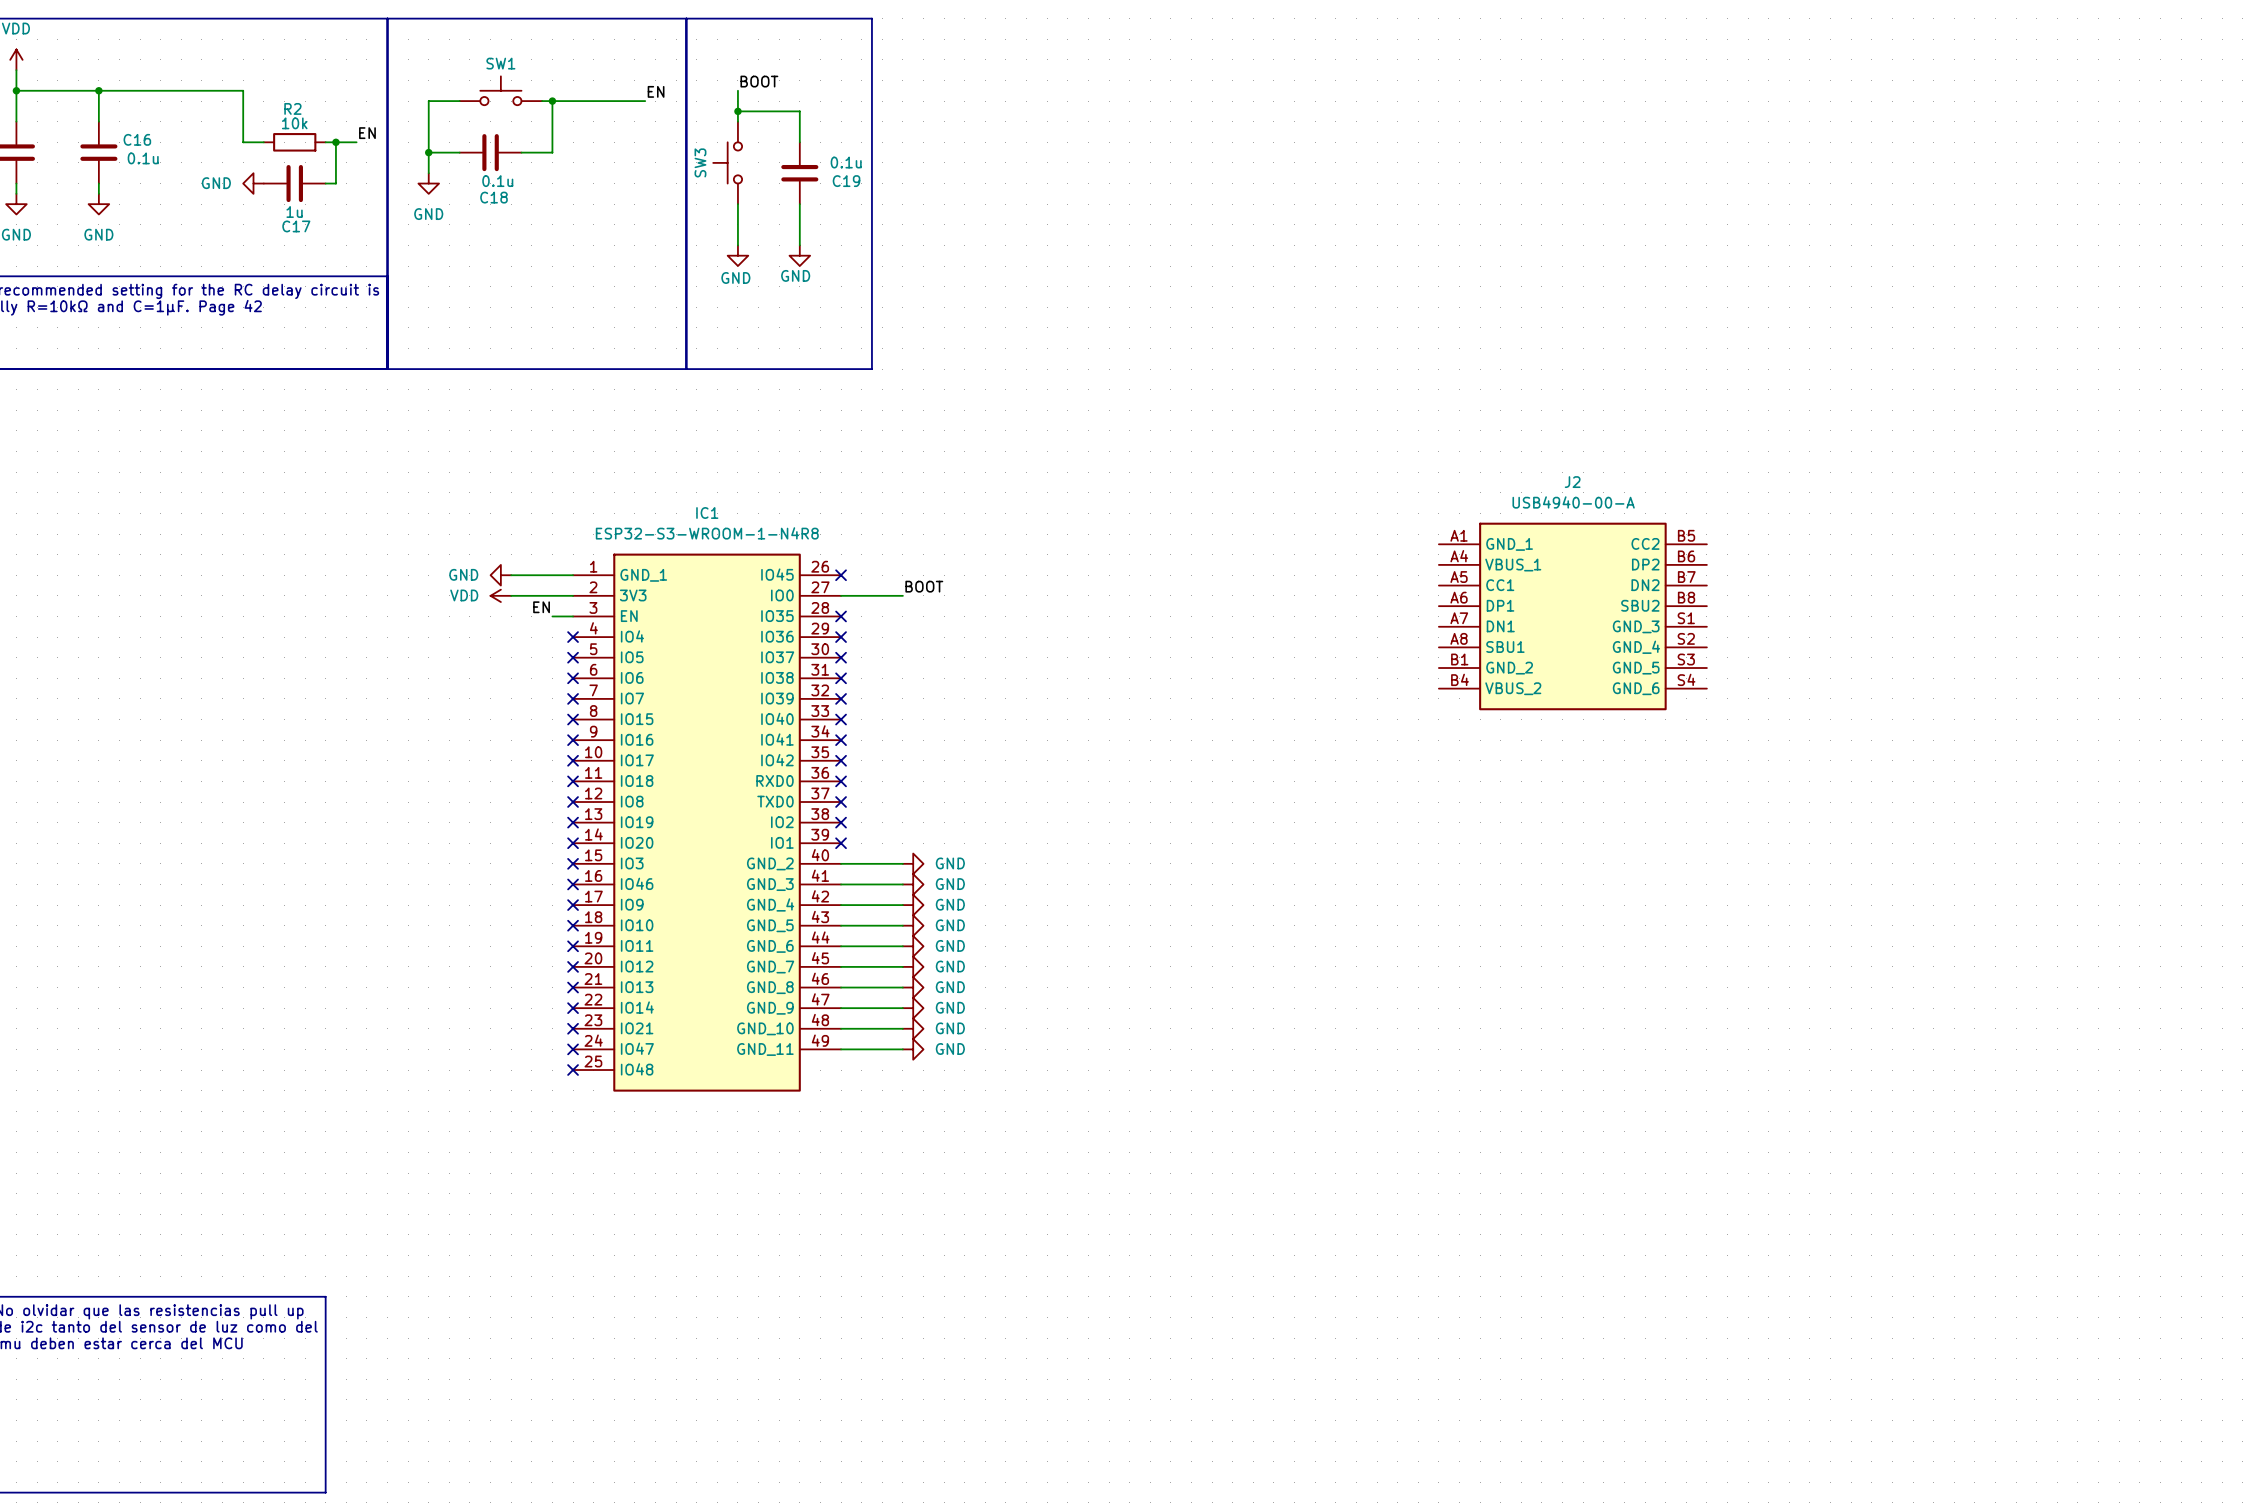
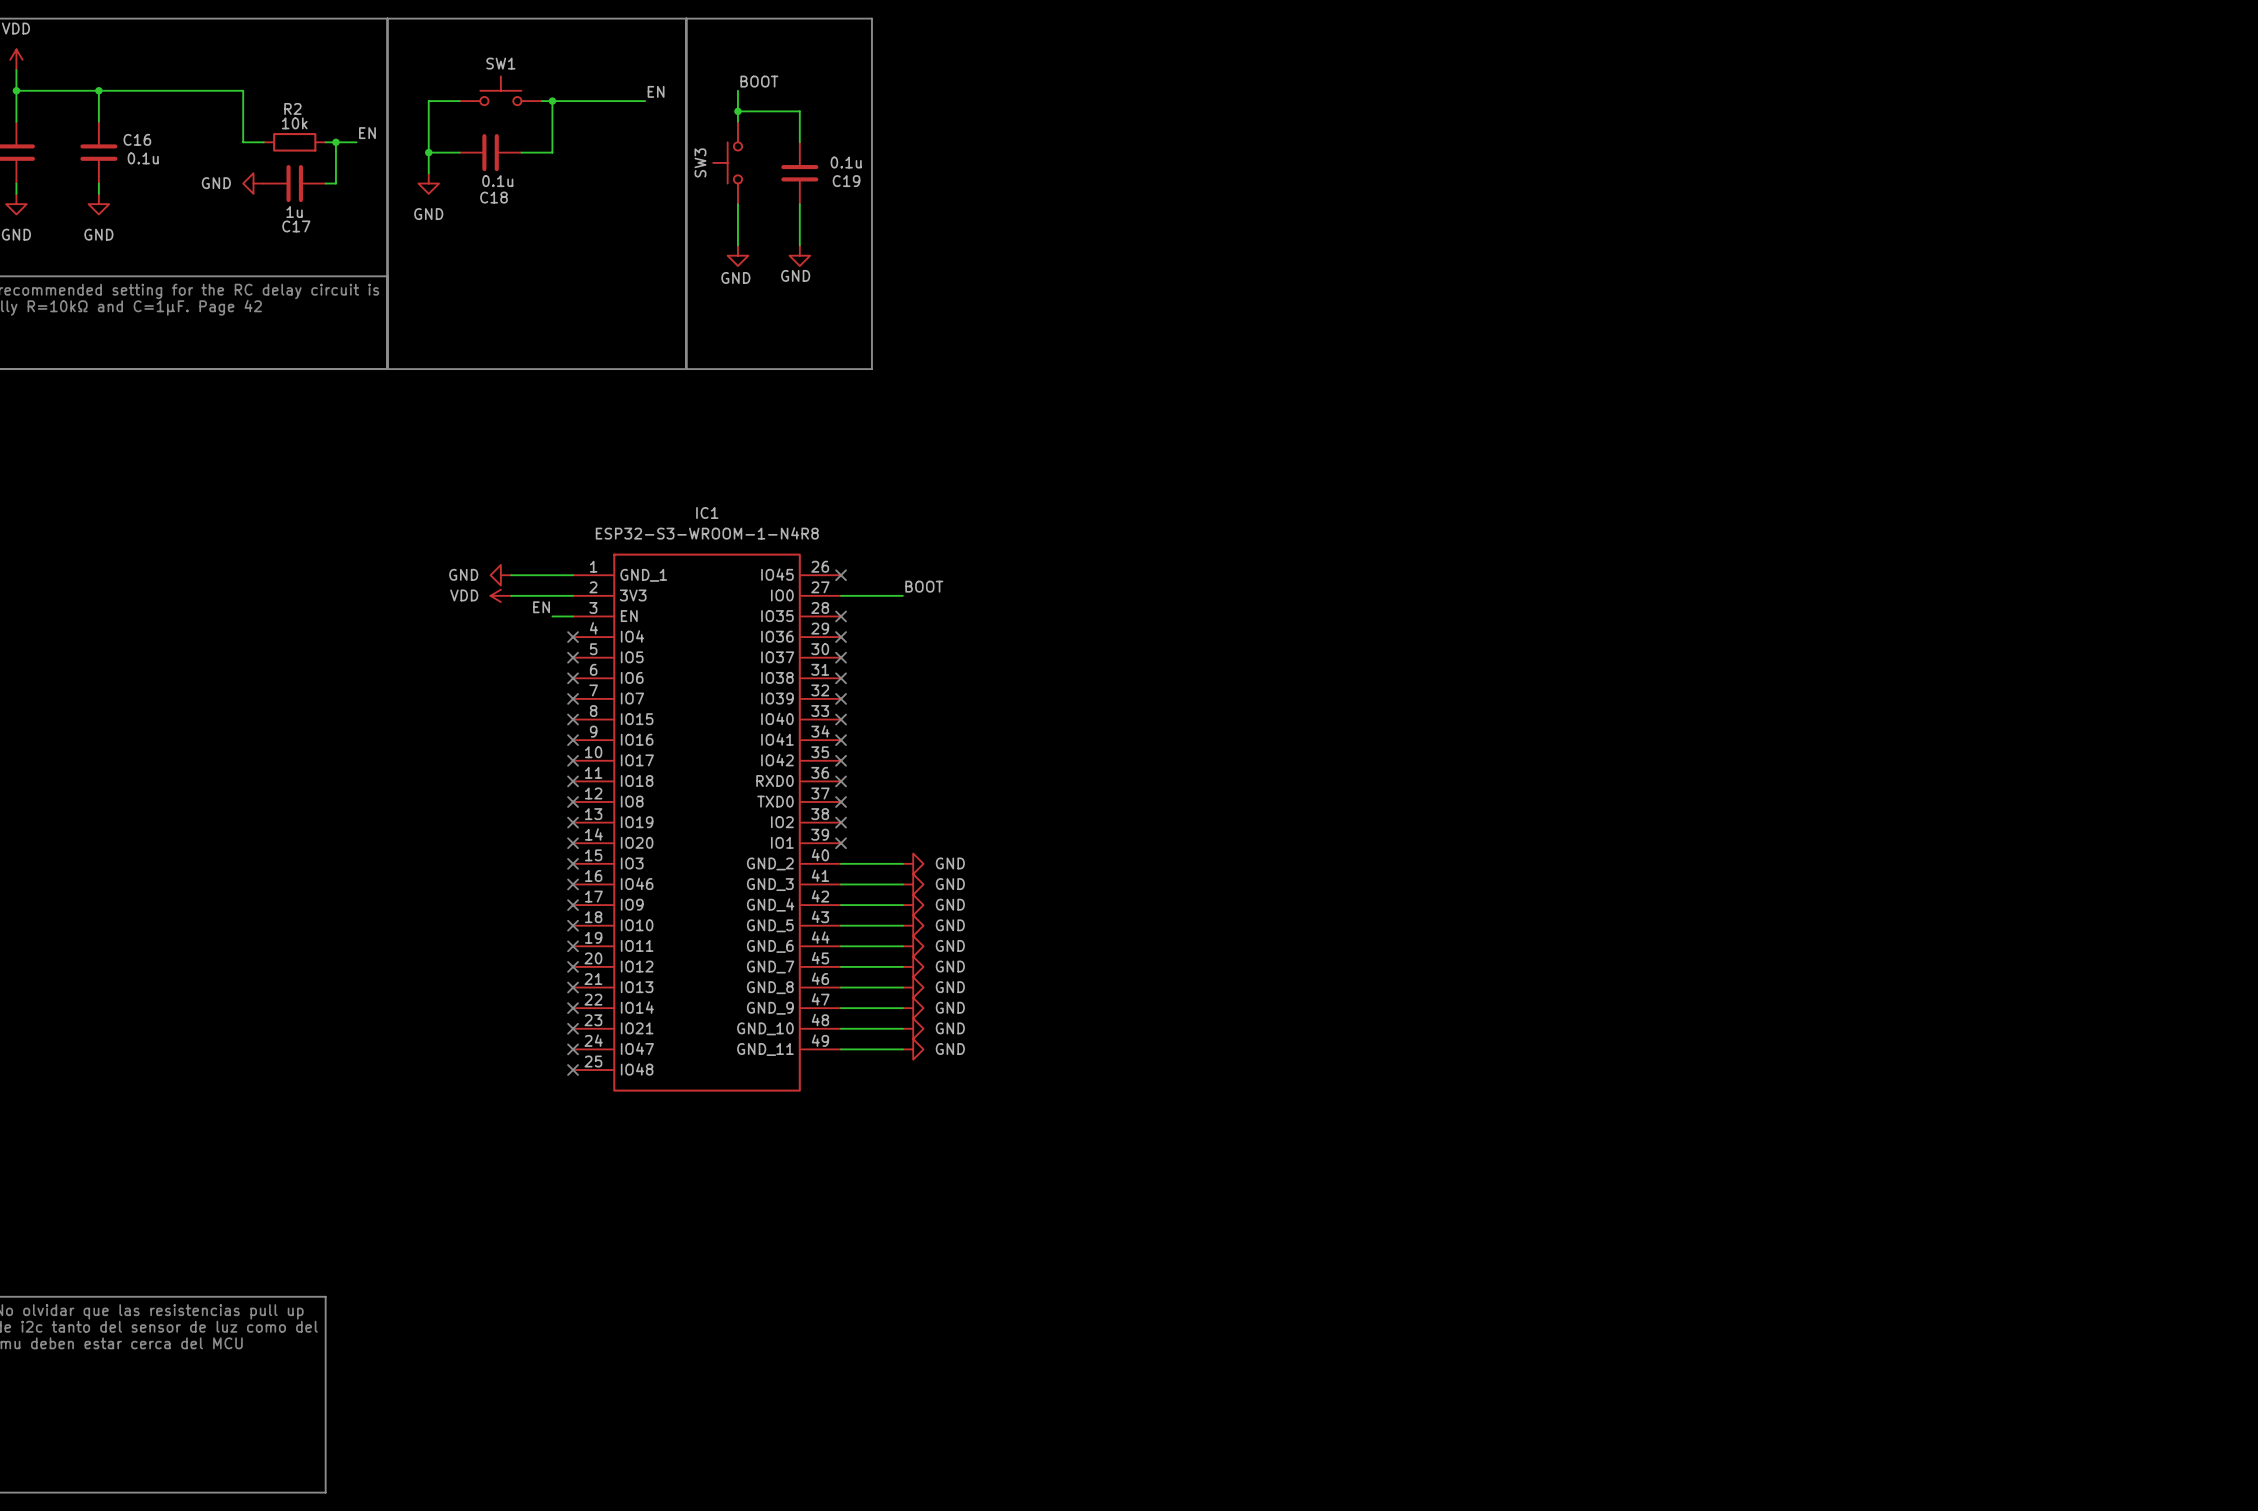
J2: USB4940-00-A (1572, 616) -> none

